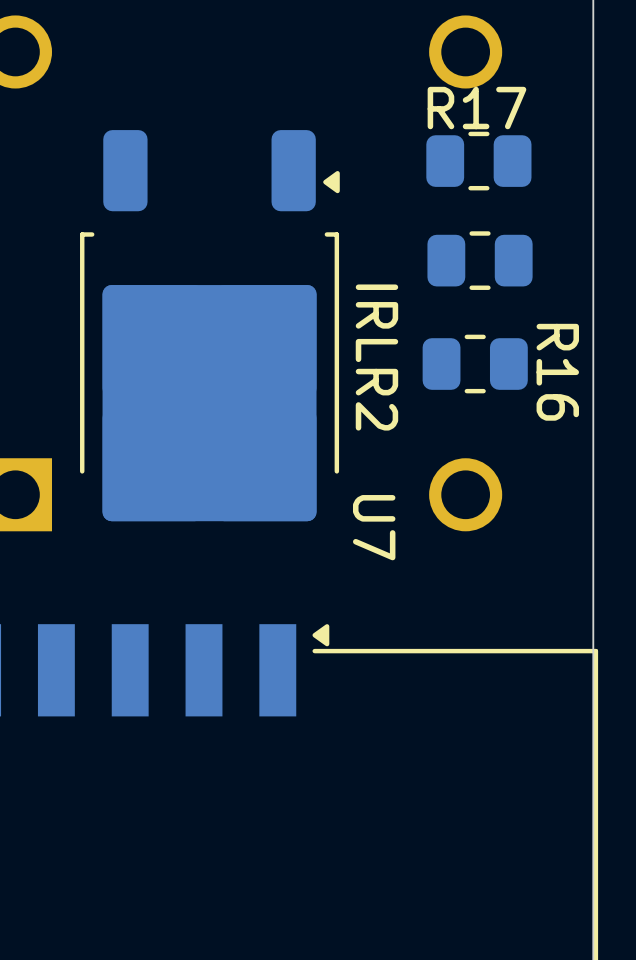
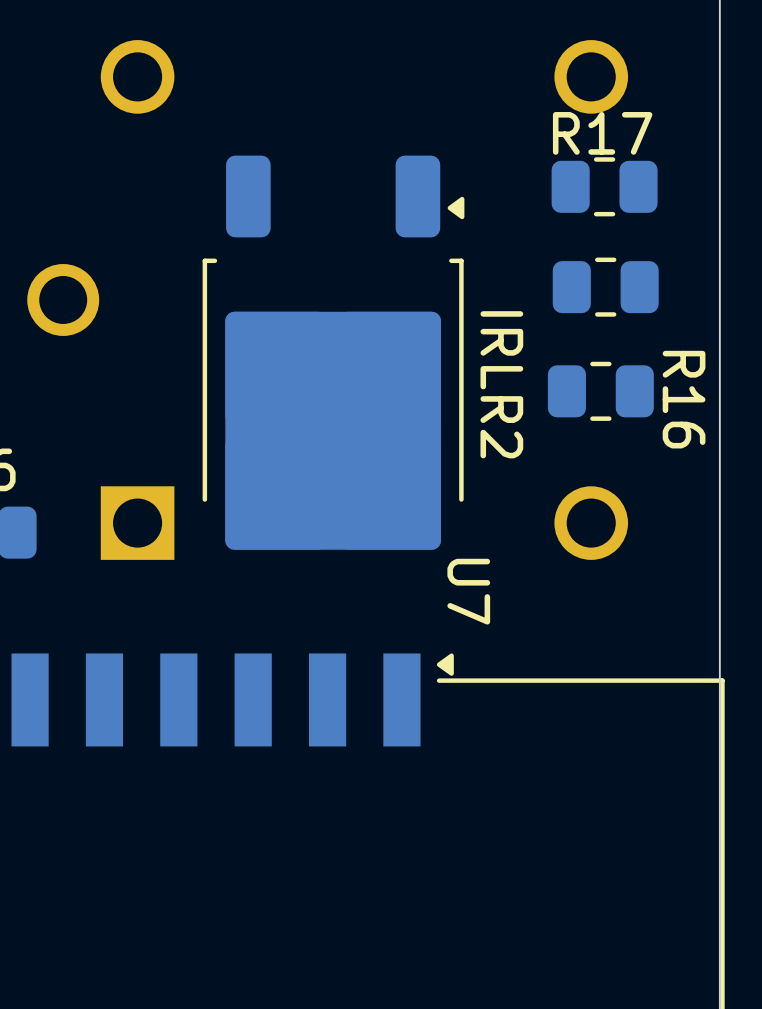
U7 name position: U7 (374, 527) -> U7 (468, 591)

